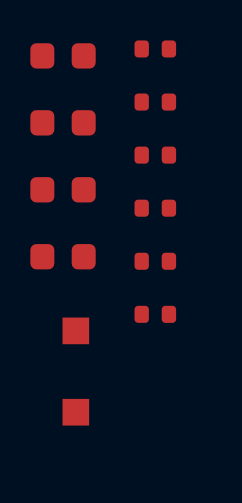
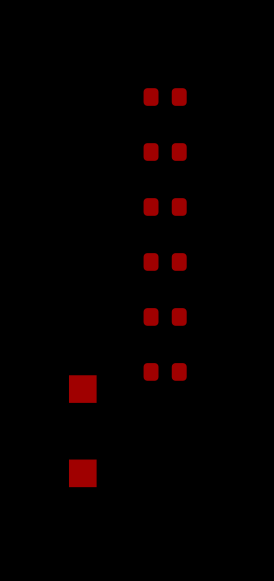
part: (63, 55) -> none
part: (63, 122) -> none
part: (63, 189) -> none
part: (63, 256) -> none

